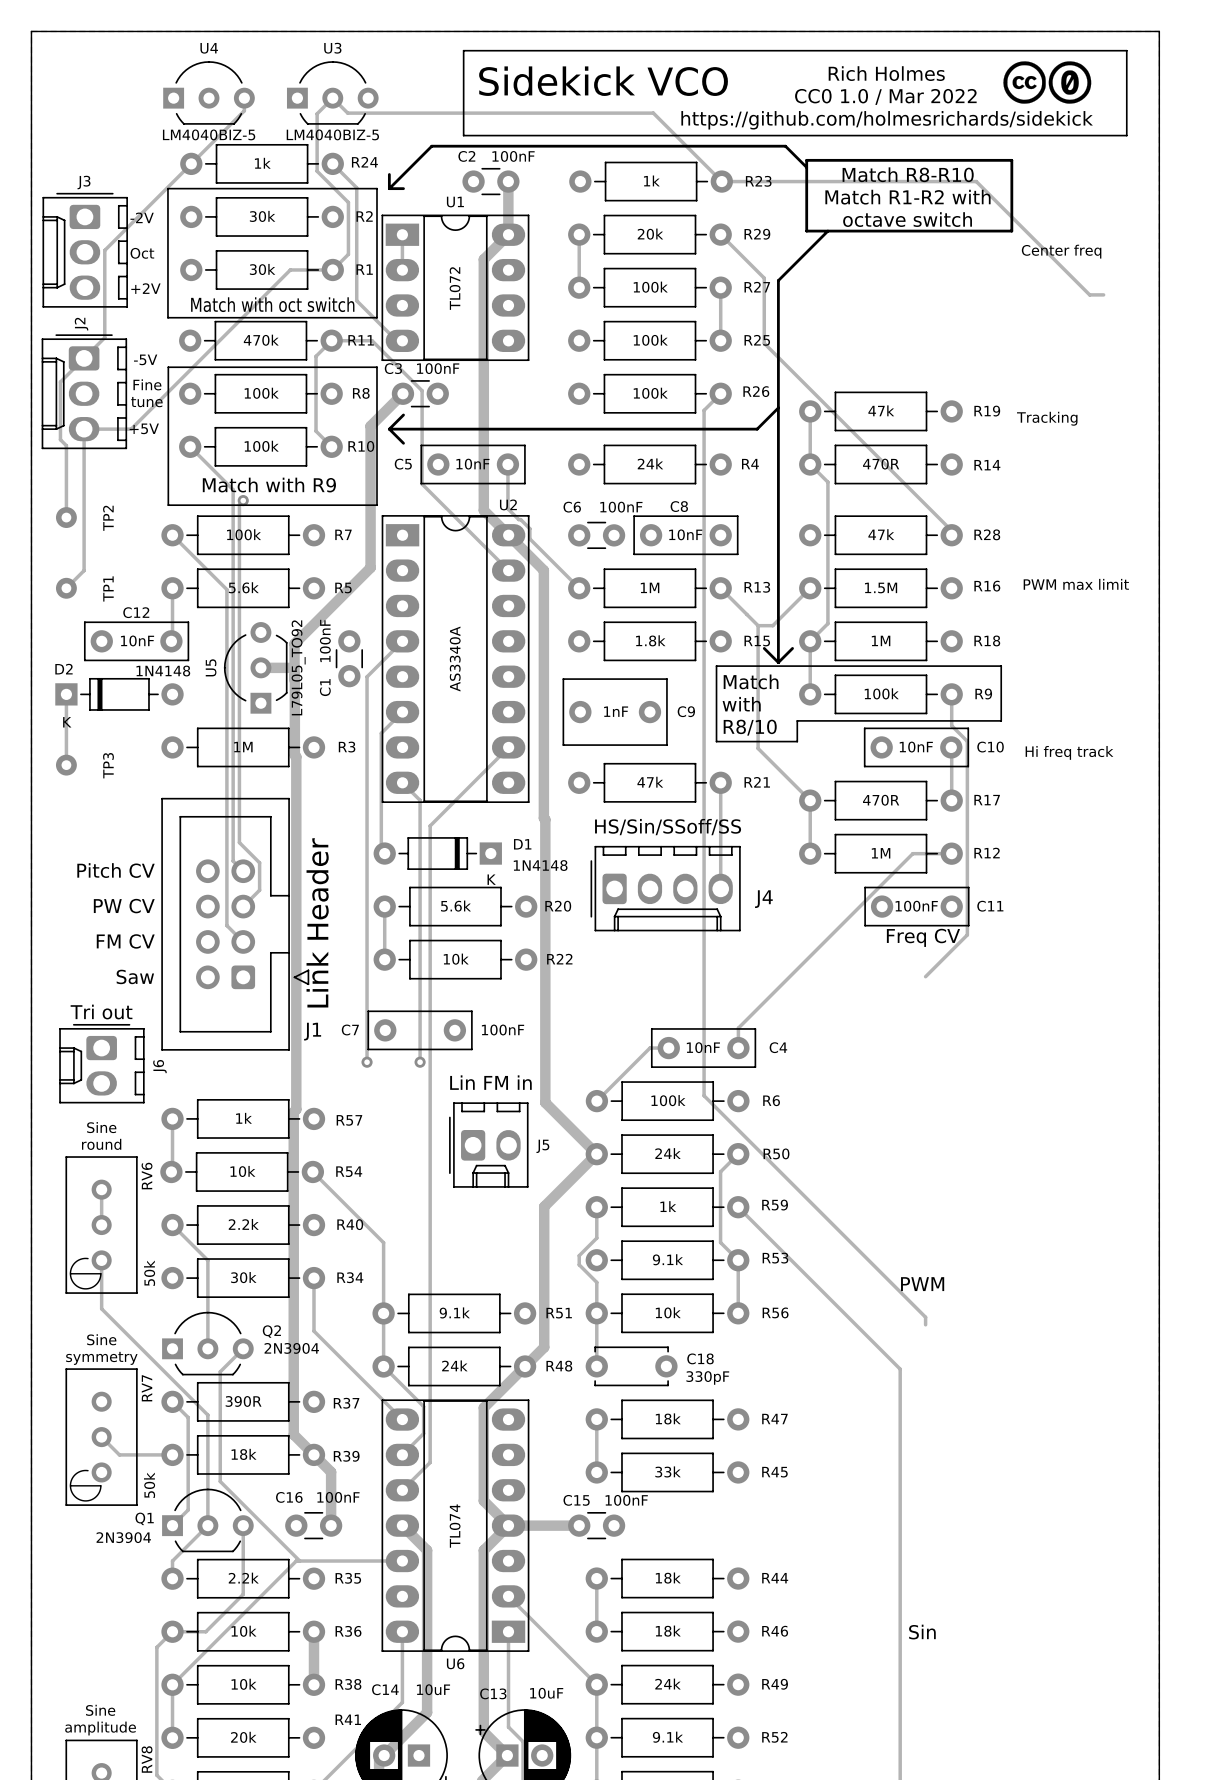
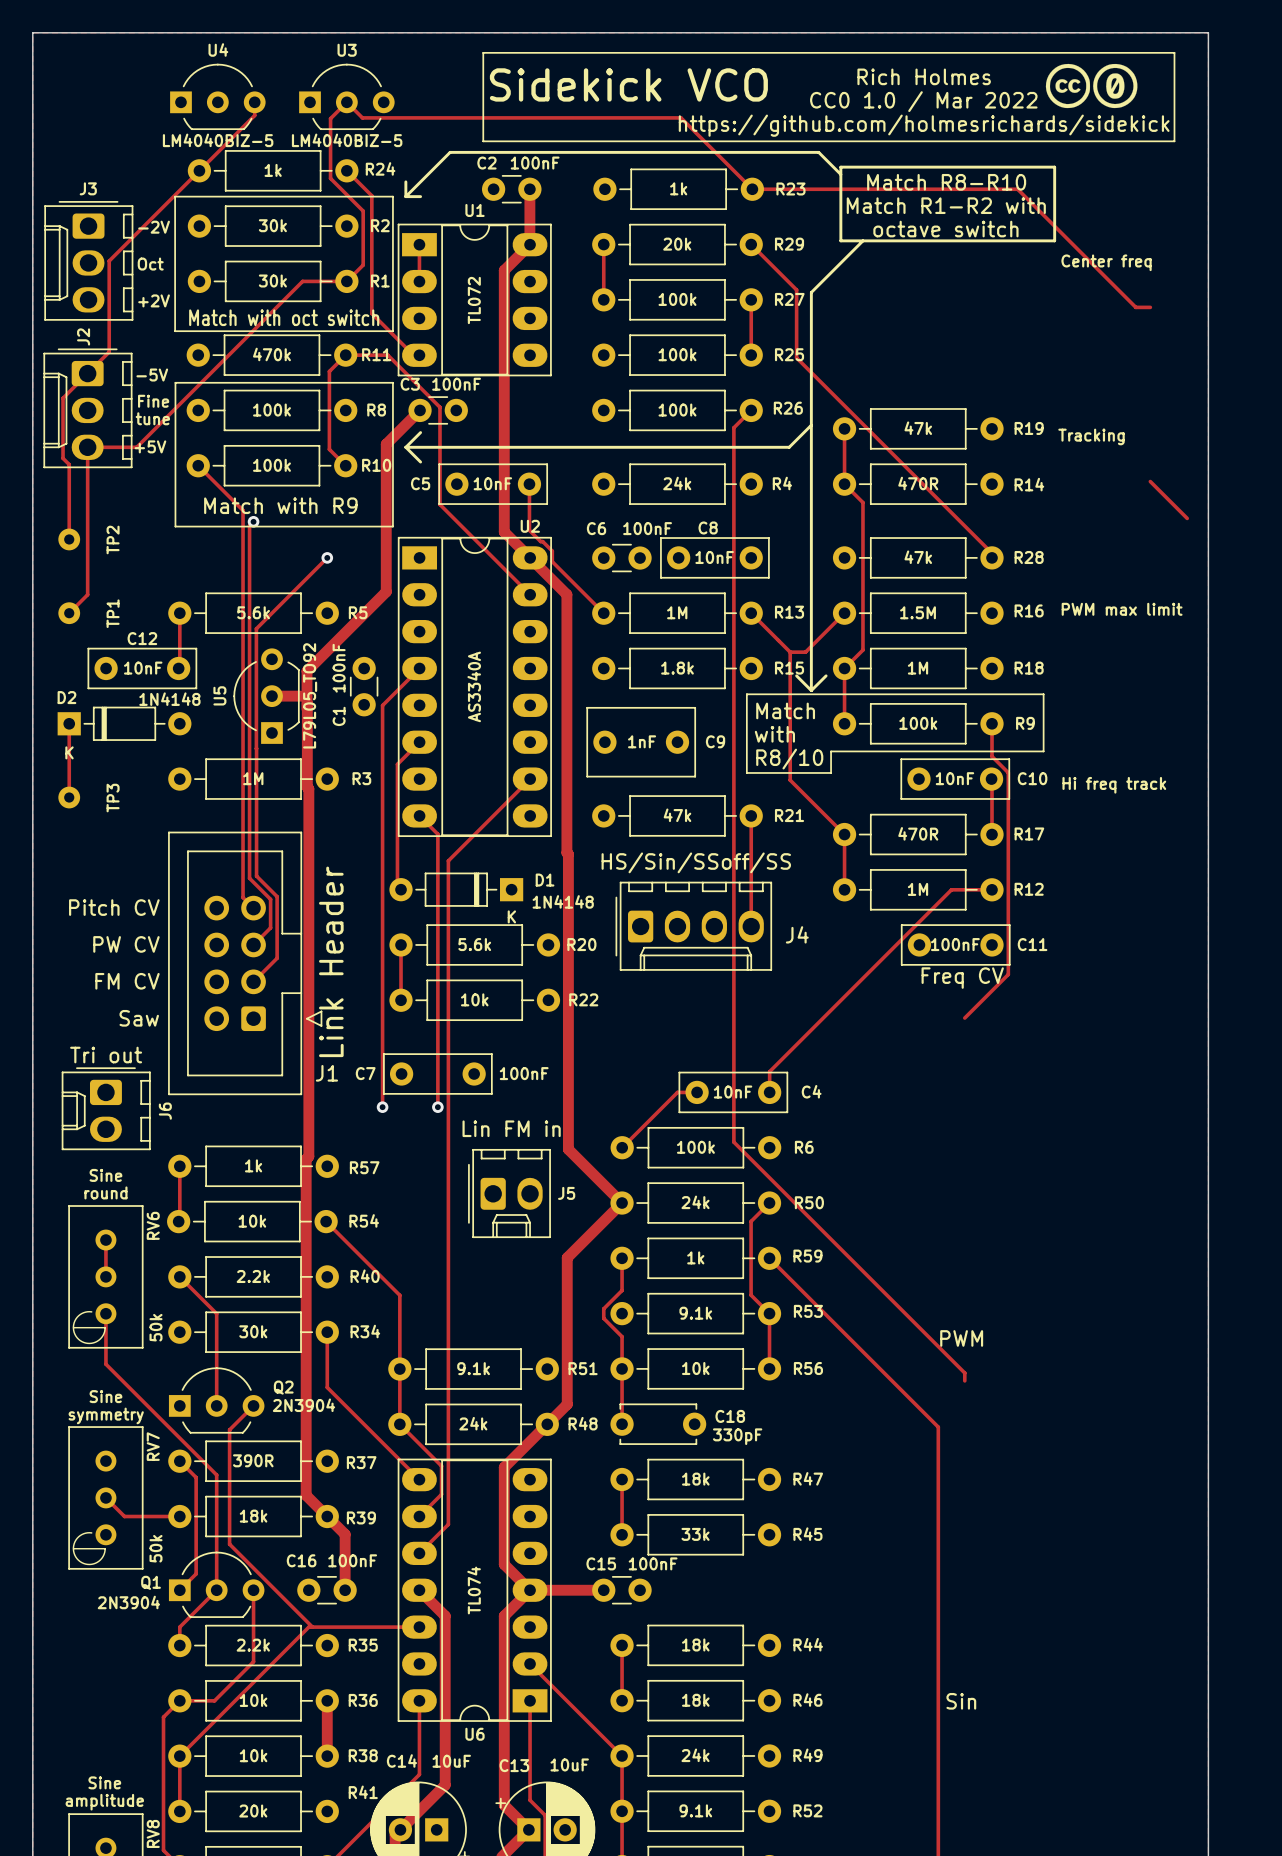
track: none -> (1150, 481) (1187, 518)
track: (172, 535) (226, 589) (226, 925) (243, 941) -> (256, 748) (256, 876) (277, 896) (277, 958) (253, 981)
R7: 100k (243, 535) -> none
track: none -> (327, 557) (256, 628) (256, 748)
via: none -> (327, 557)

